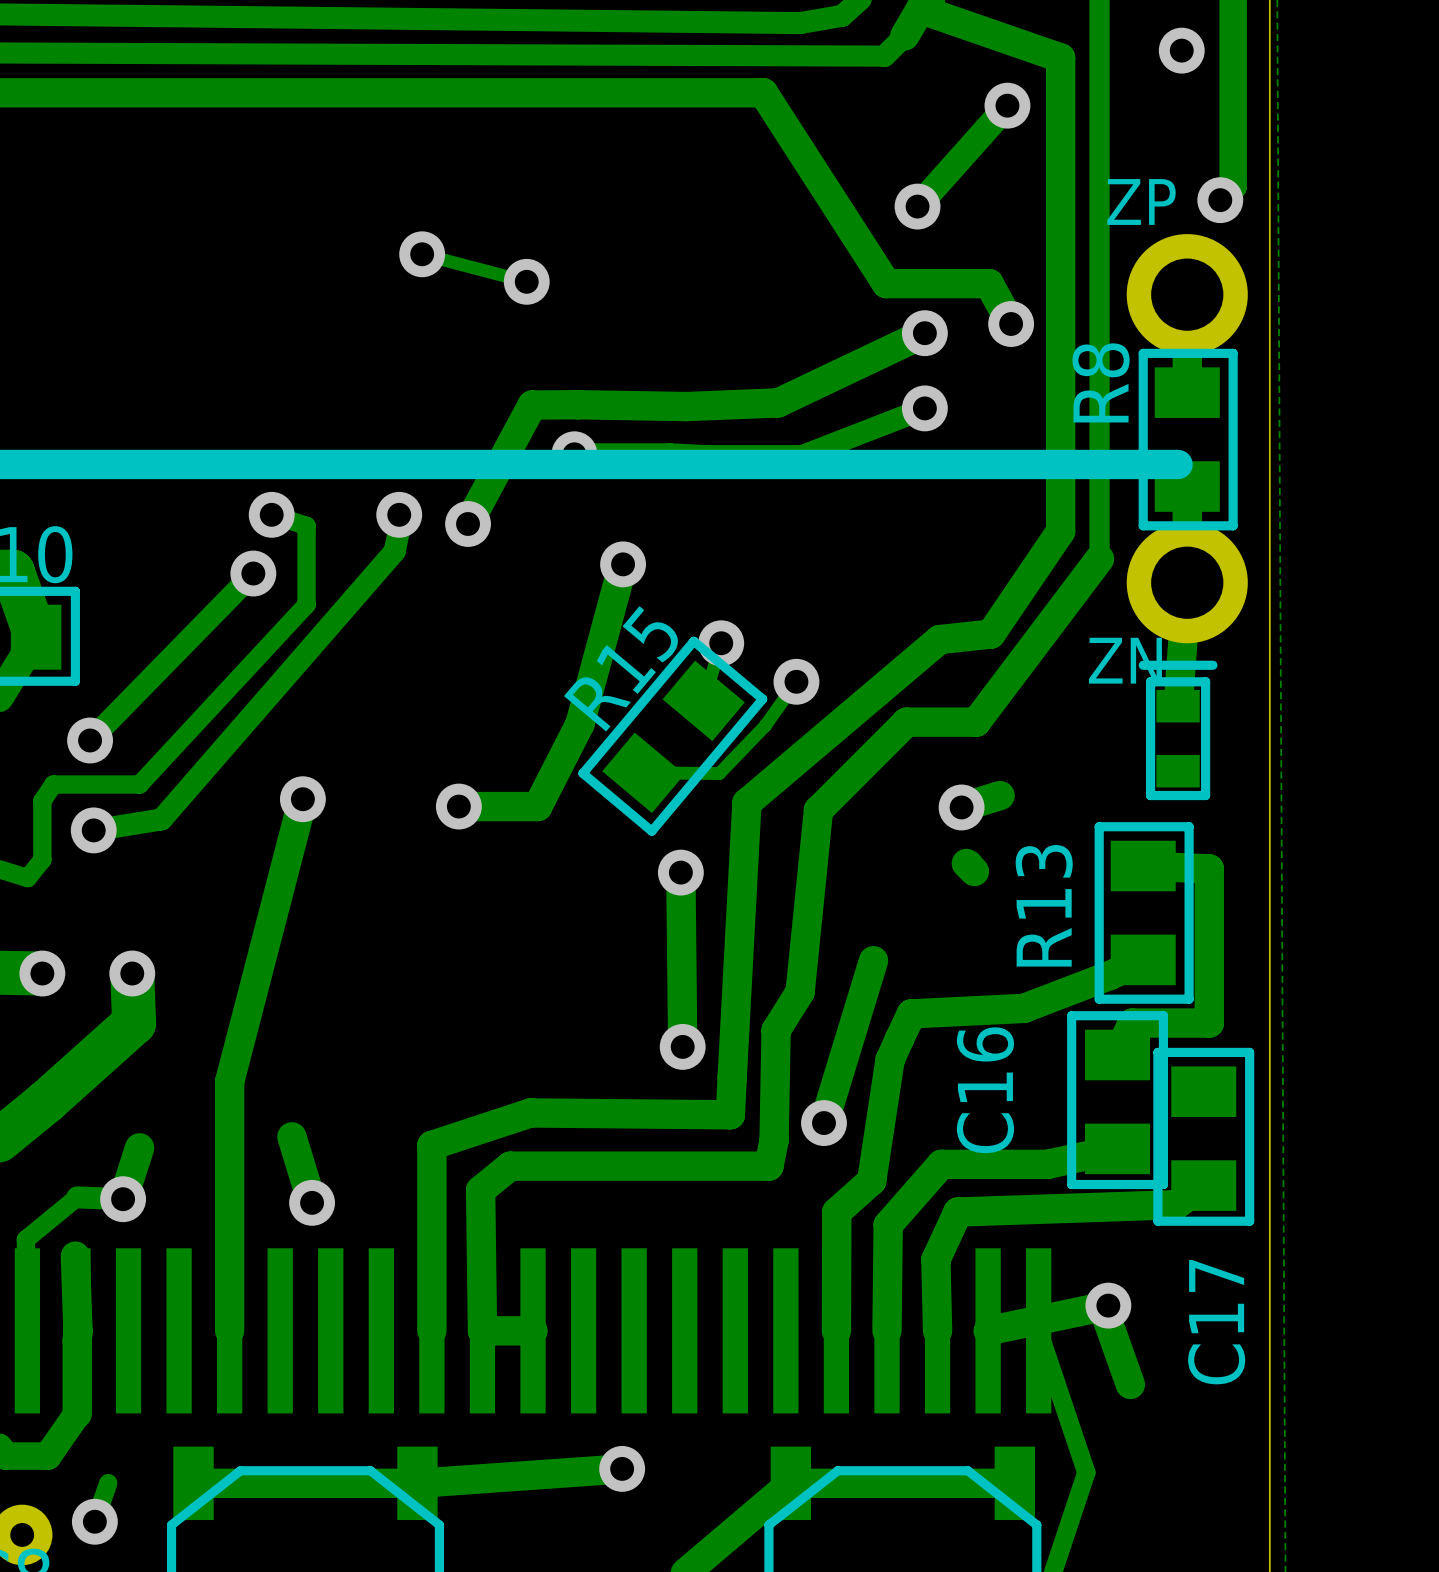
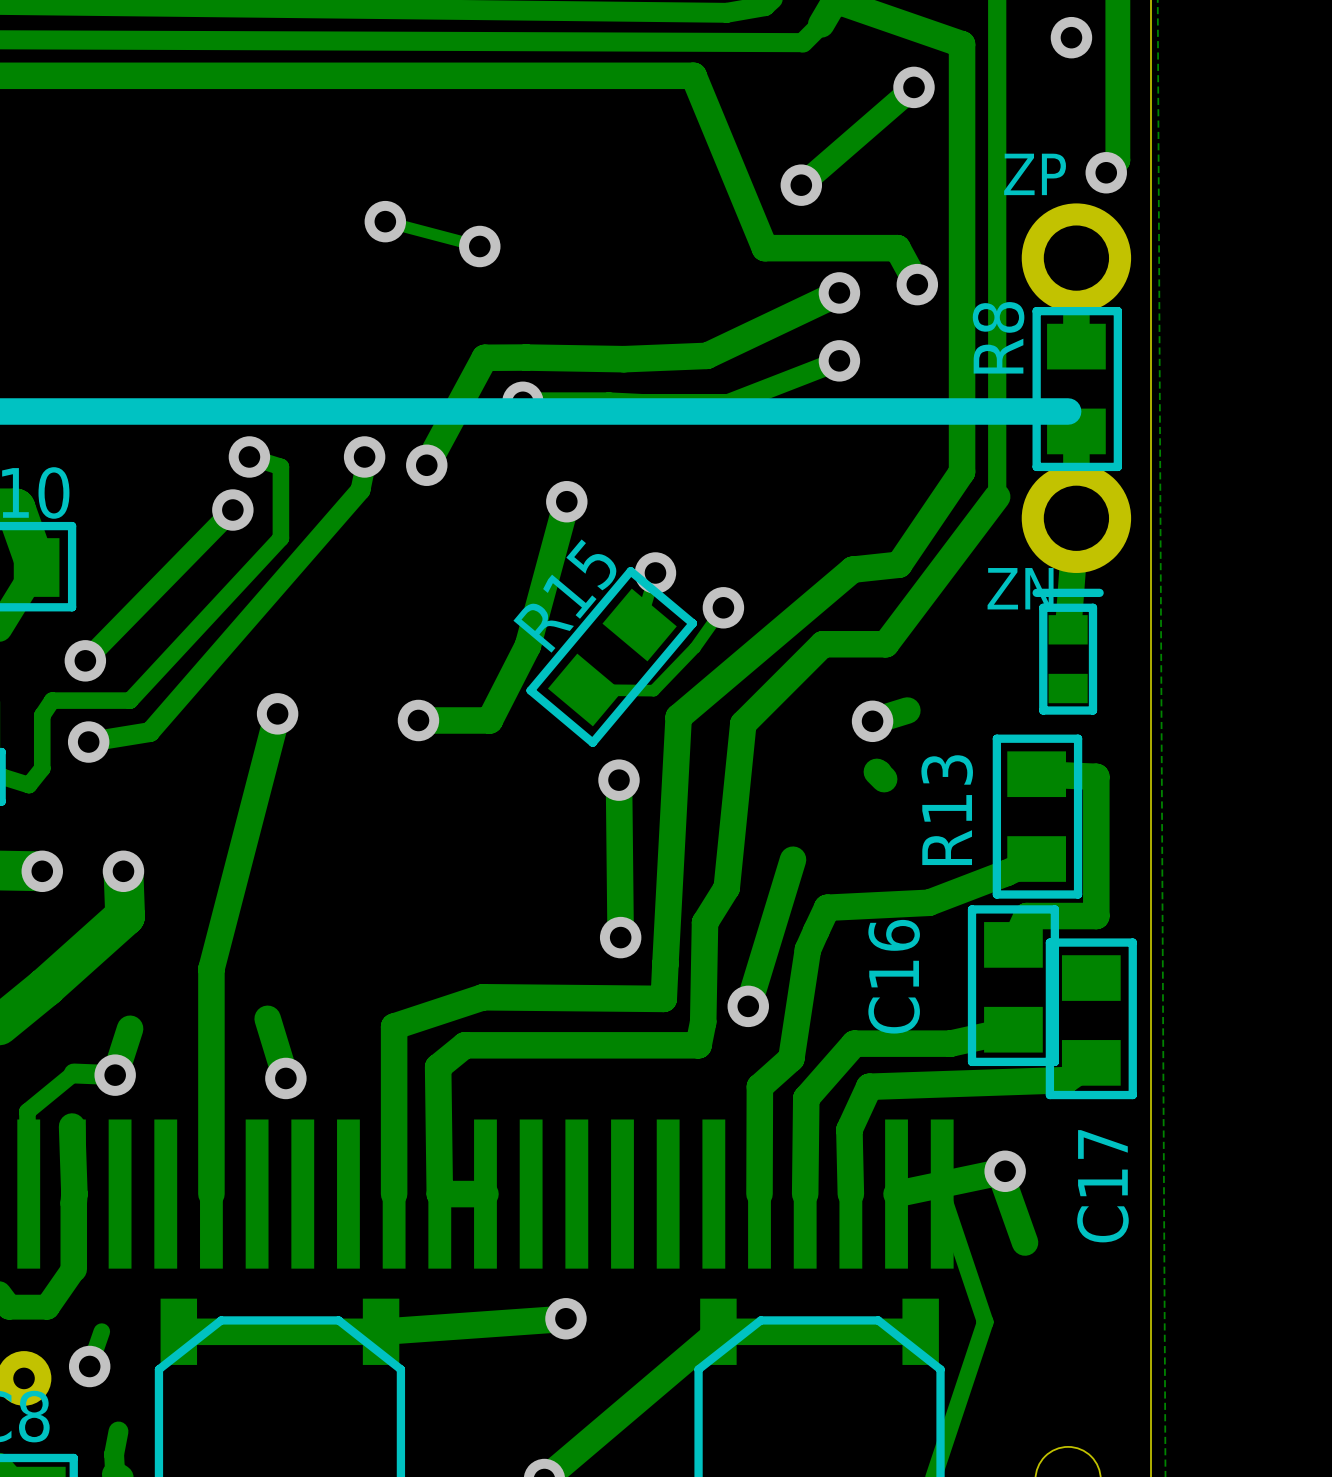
track: (763, 92) (886, 283) -> (693, 75) (764, 248) (804, 248)
track: (1007, 105) (917, 206) -> (914, 87) (801, 185)
via position: (917, 206) -> (801, 185)

